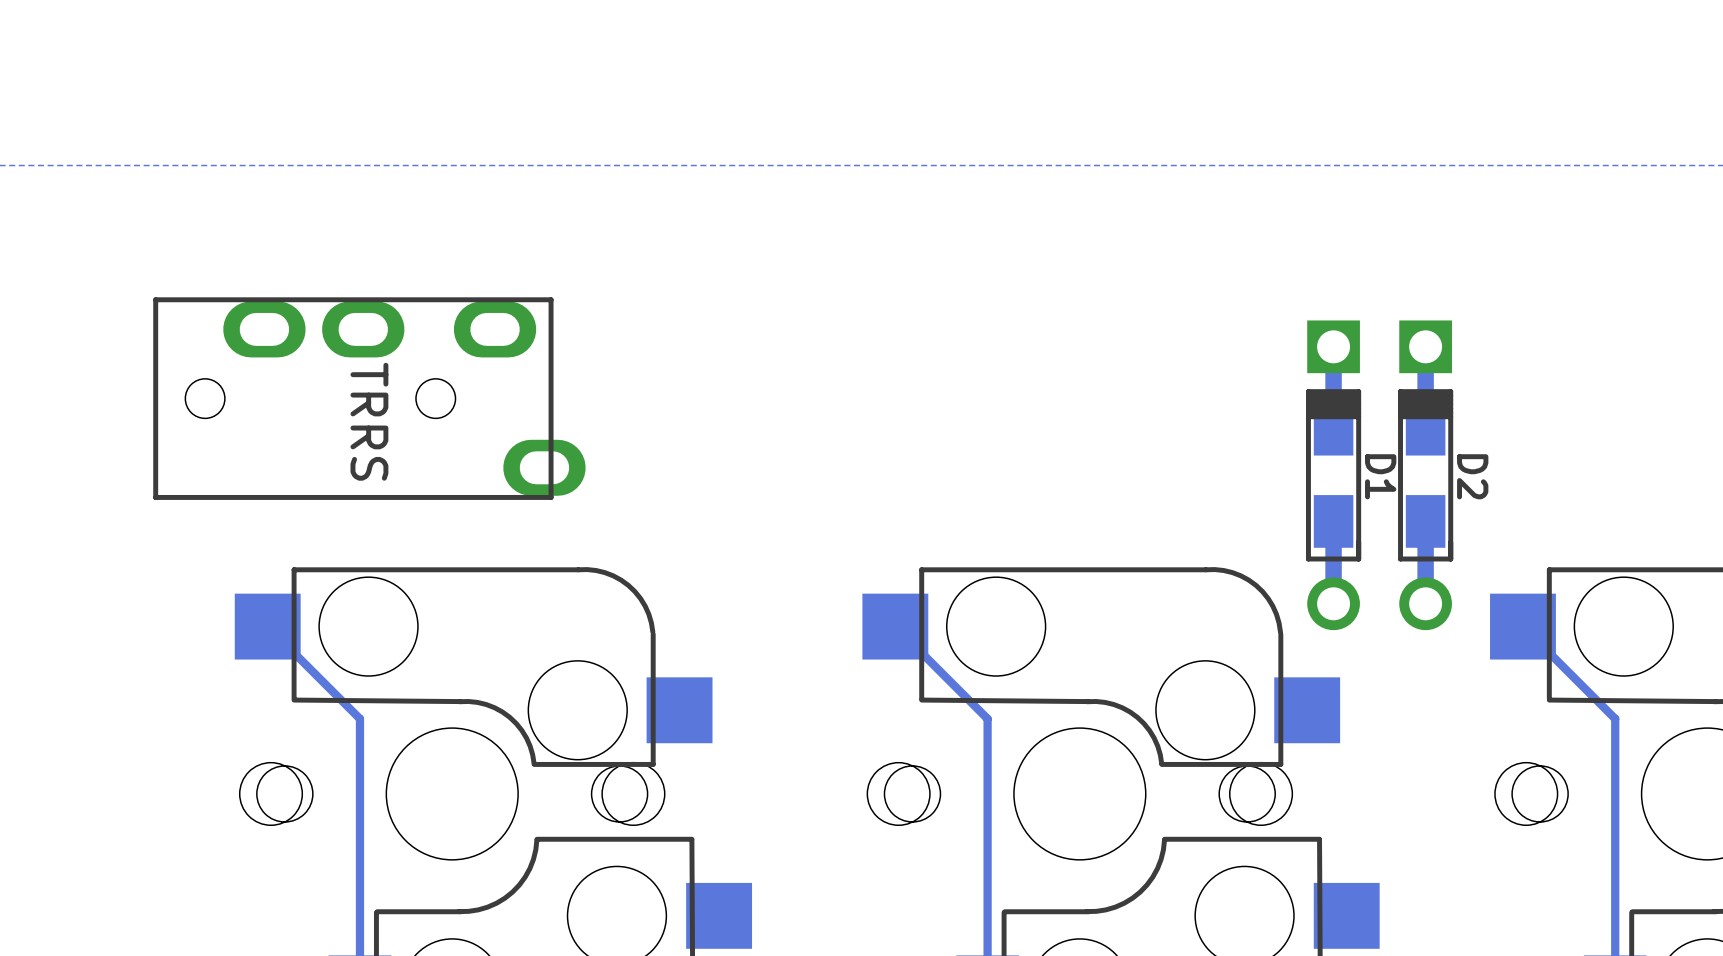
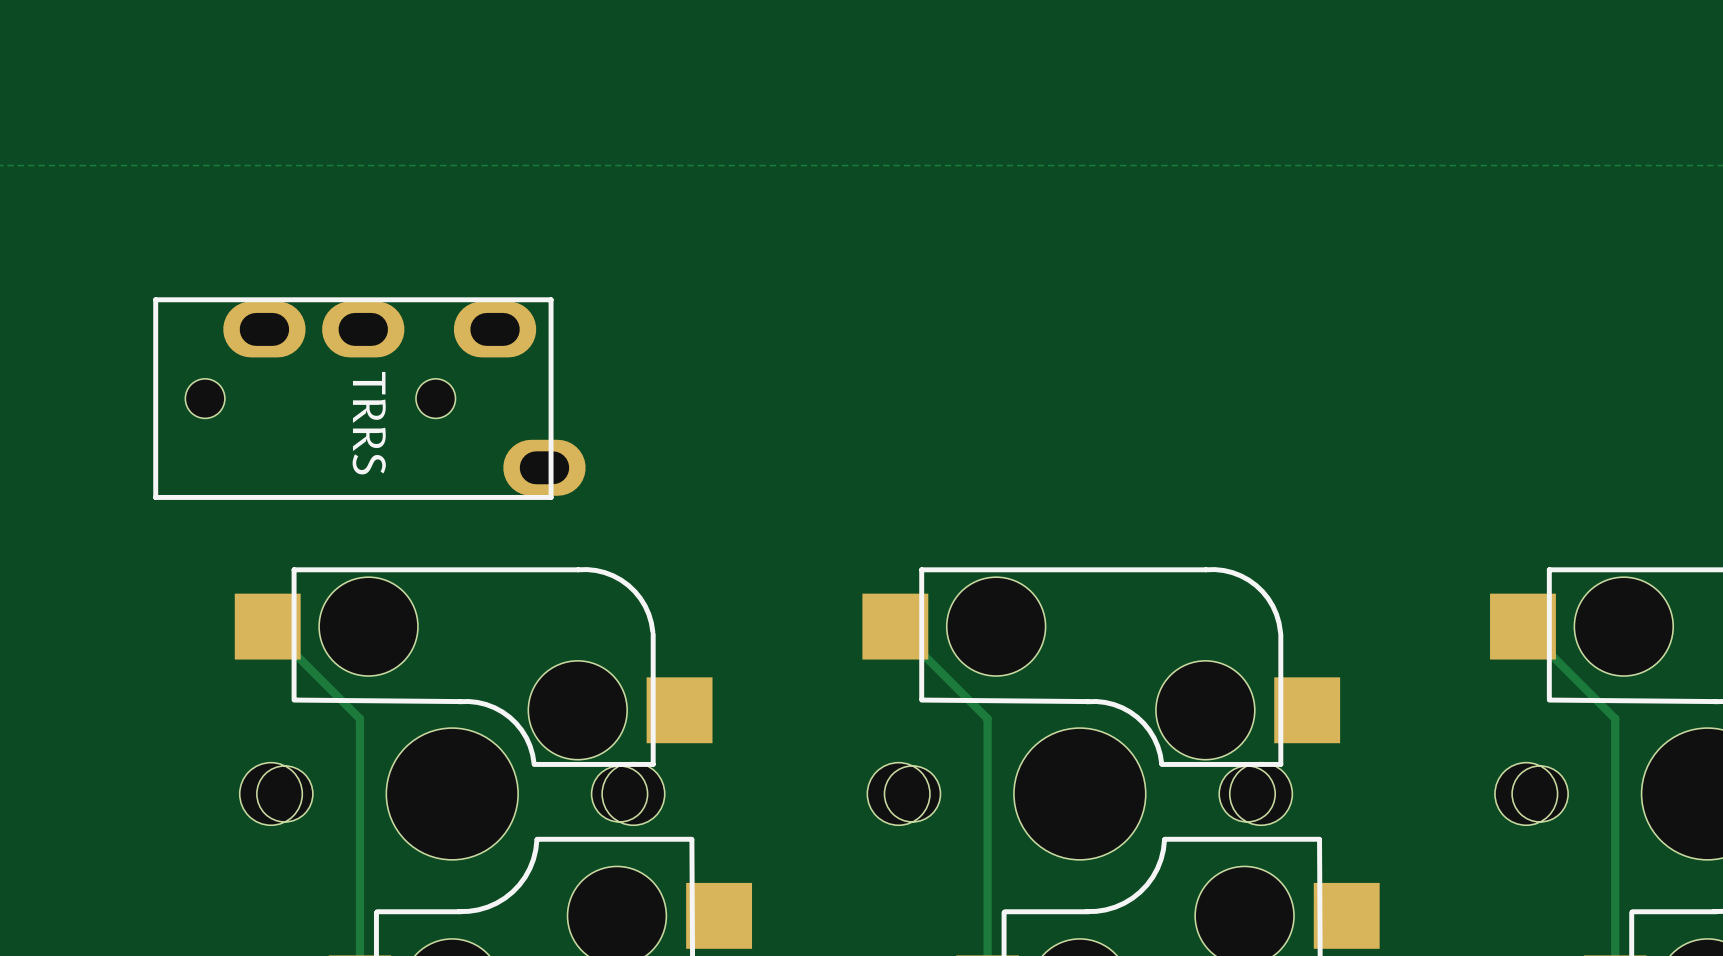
D1: (1333, 475) -> none
D2: (1425, 475) -> none

